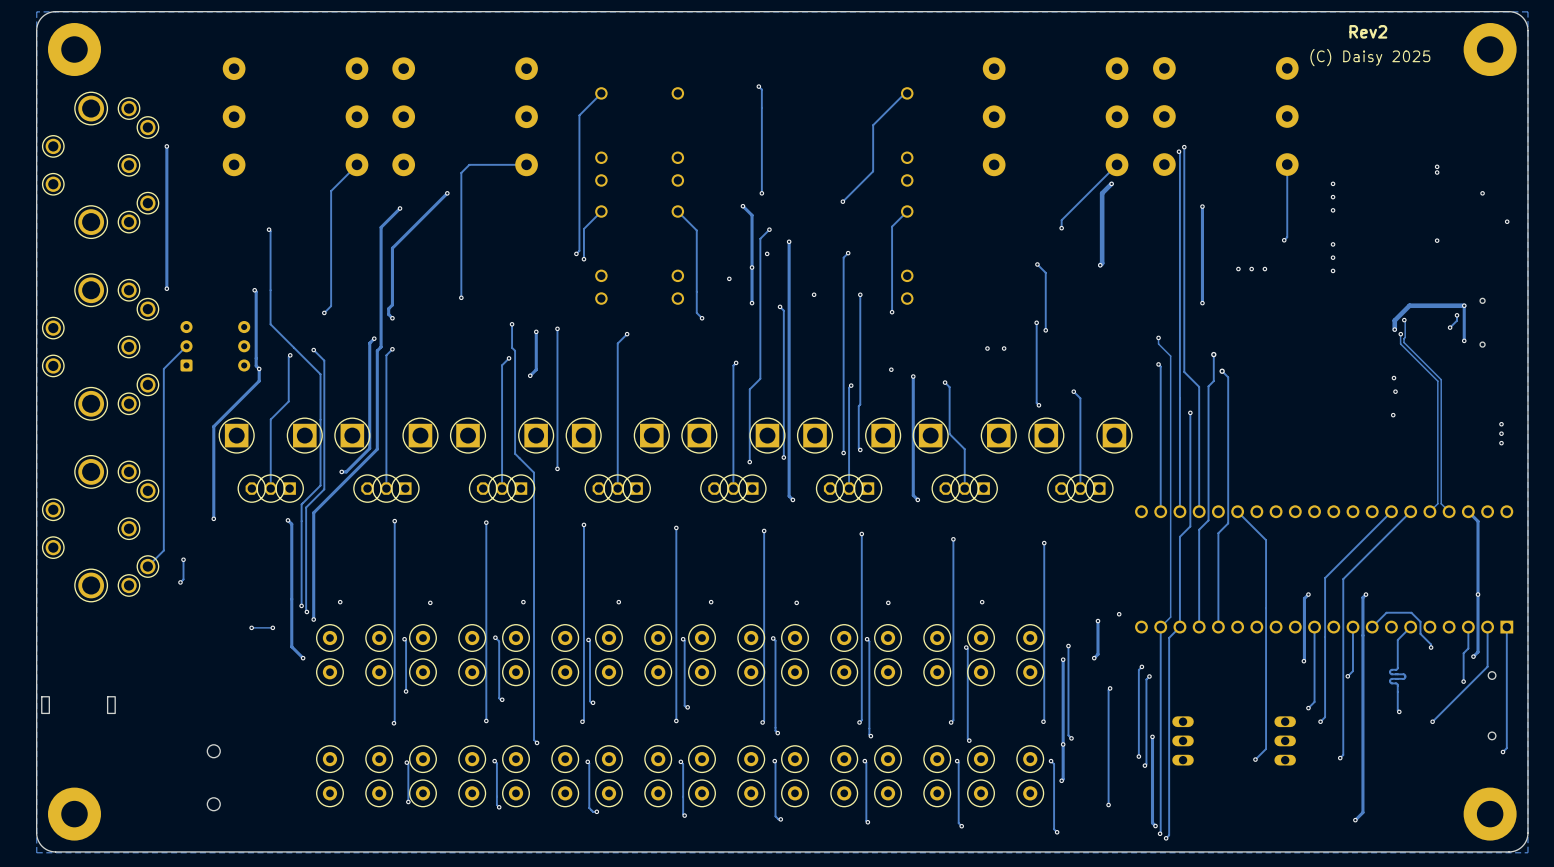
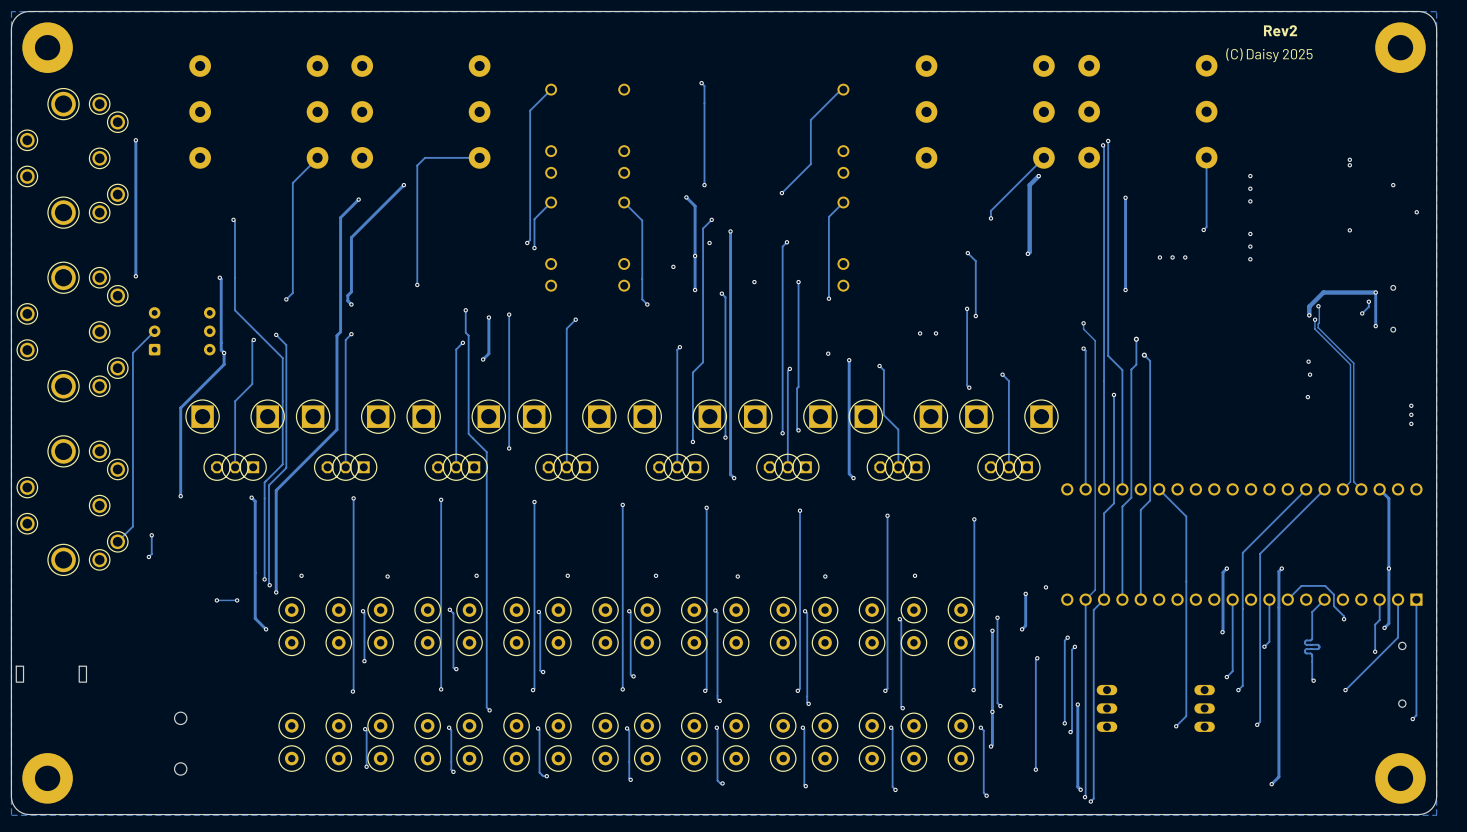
track: (374, 338) (369, 343) (369, 448) (346, 471) (341, 471) -> none
via: (374, 338) -> none
via: (341, 471) -> none

